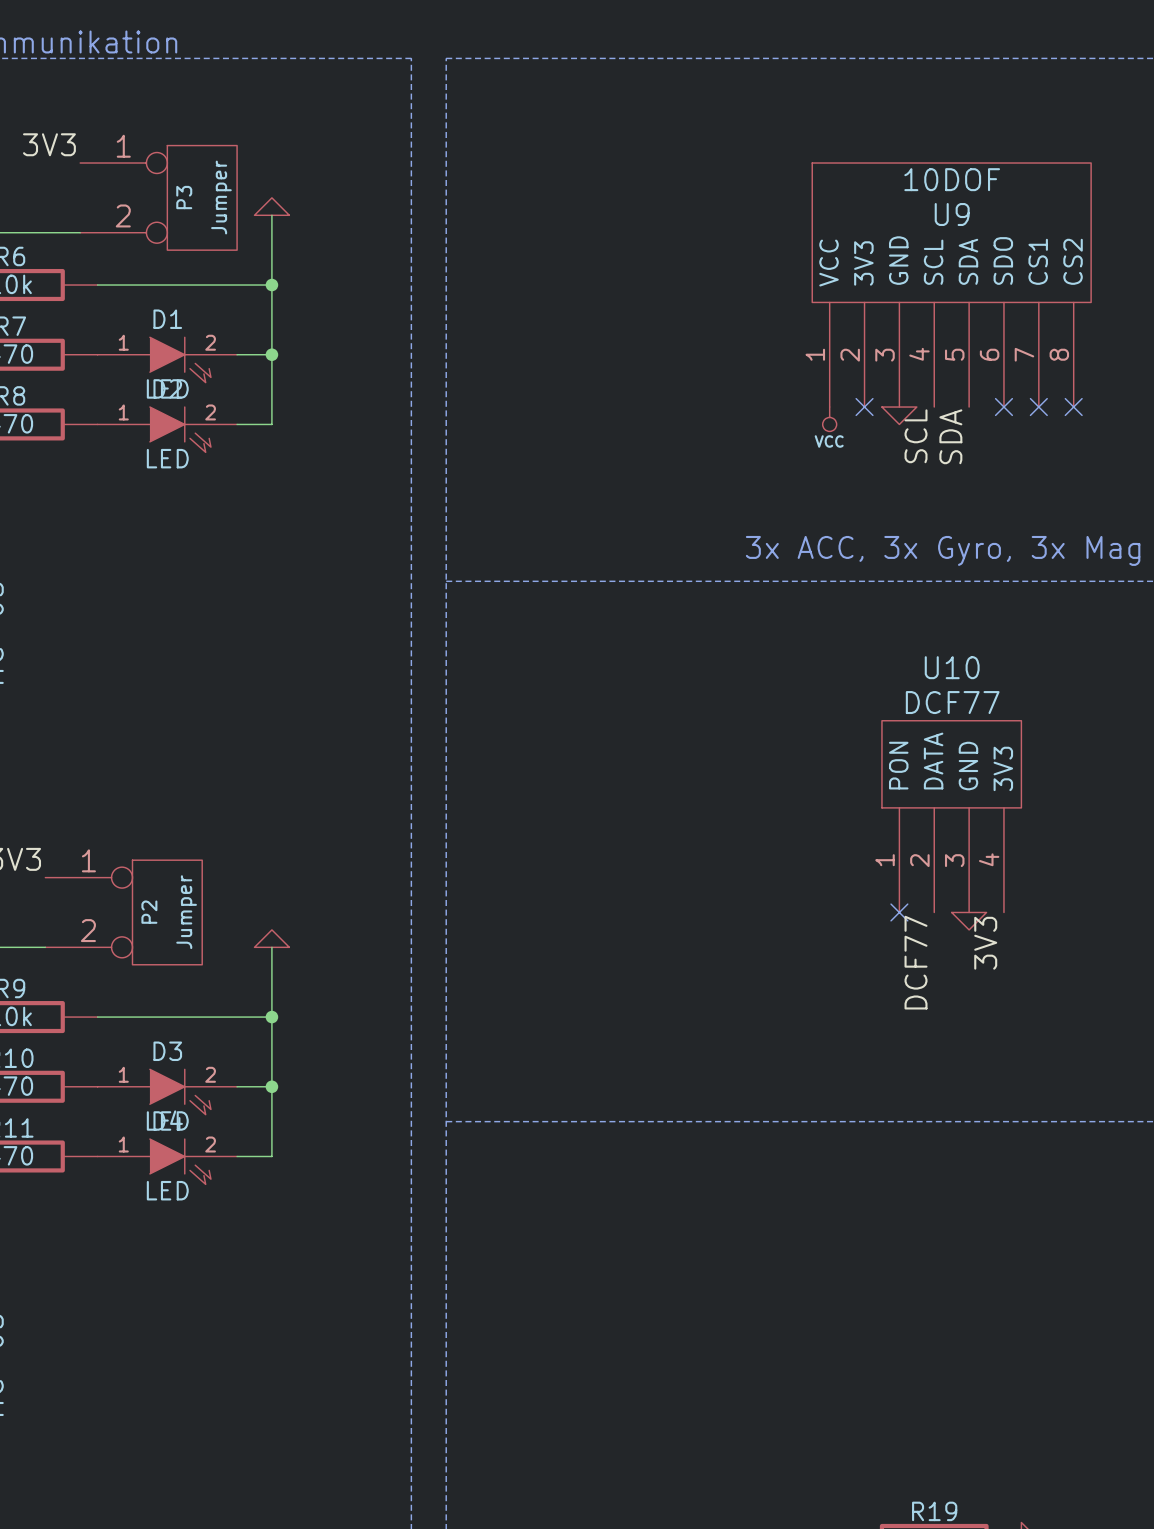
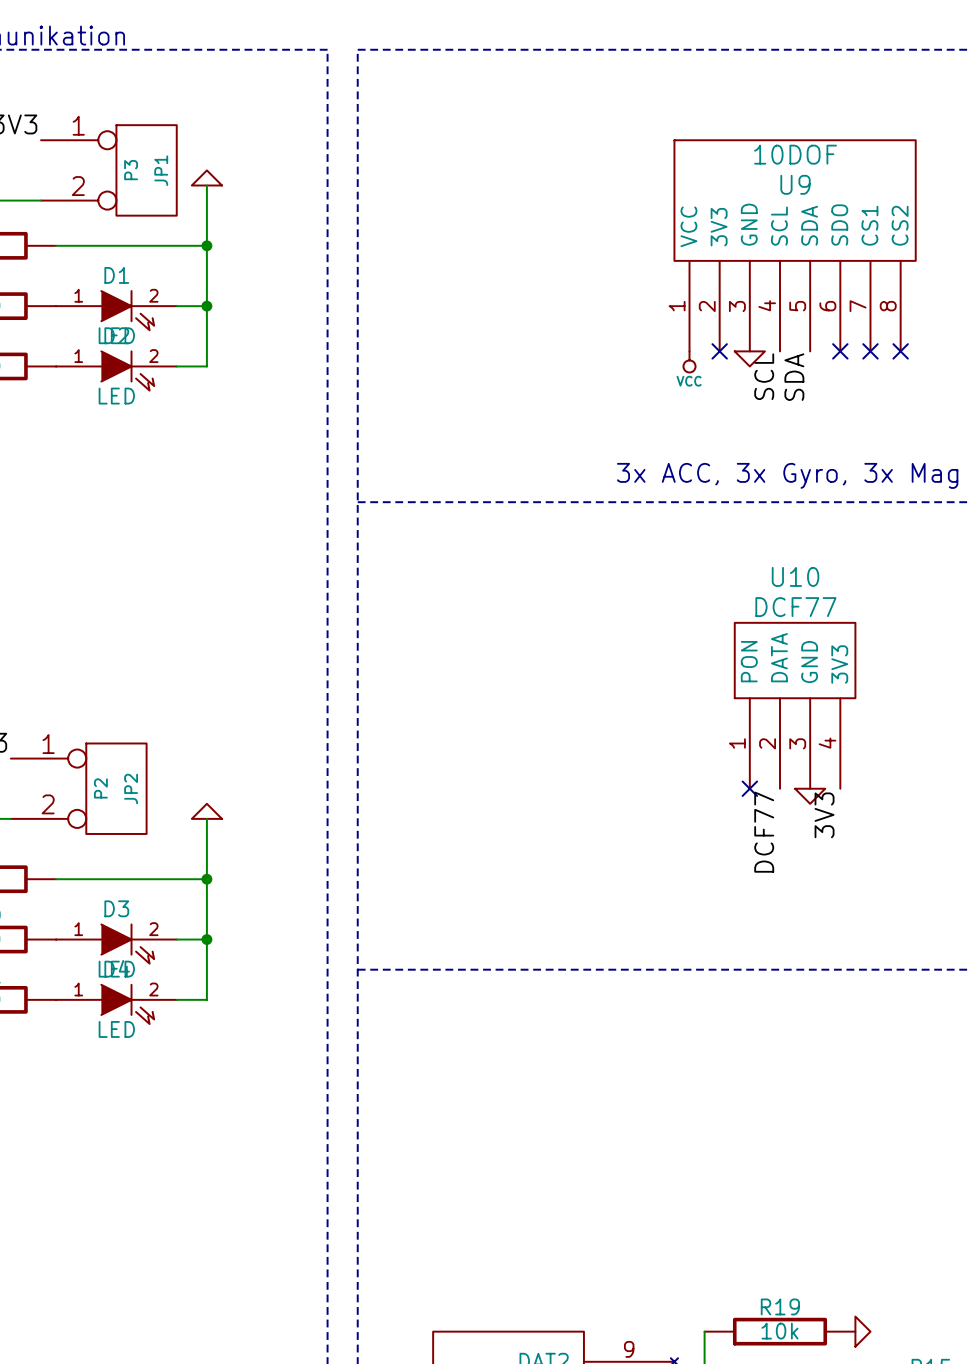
P3 value: Jumper (221, 197) -> JP1 (161, 170)
P2 value: Jumper (186, 912) -> JP2 (131, 789)

